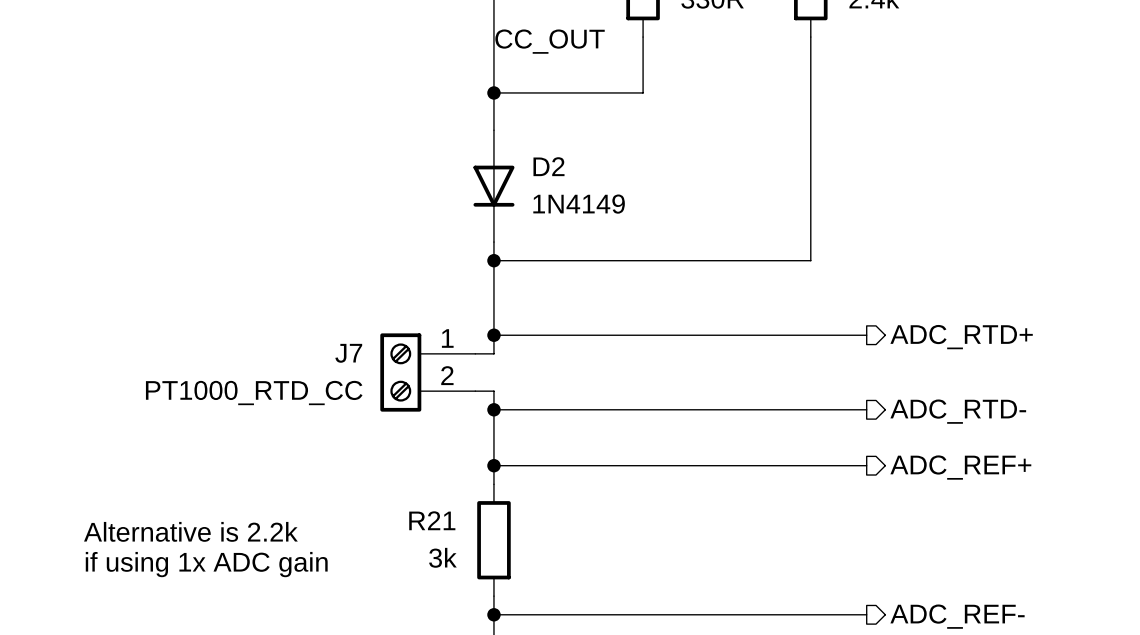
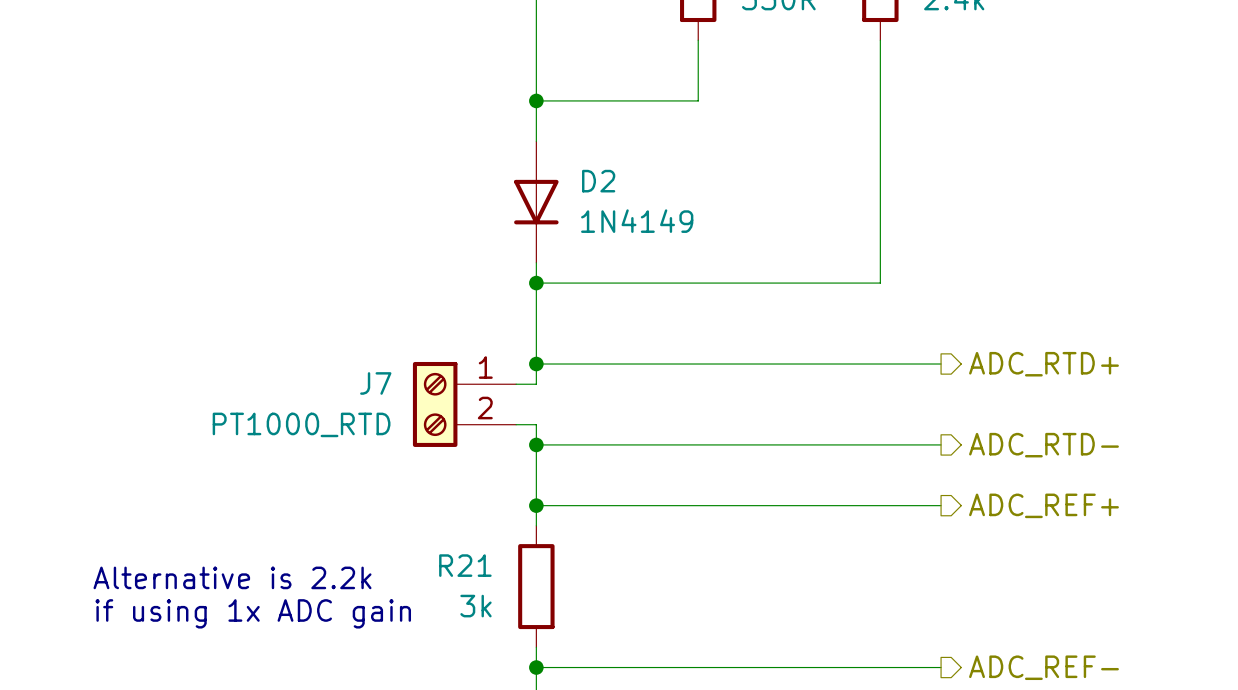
label: CC_OUT (550, 41) -> none
J7 value: PT1000_RTD_CC (254, 393) -> PT1000_RTD (301, 424)

